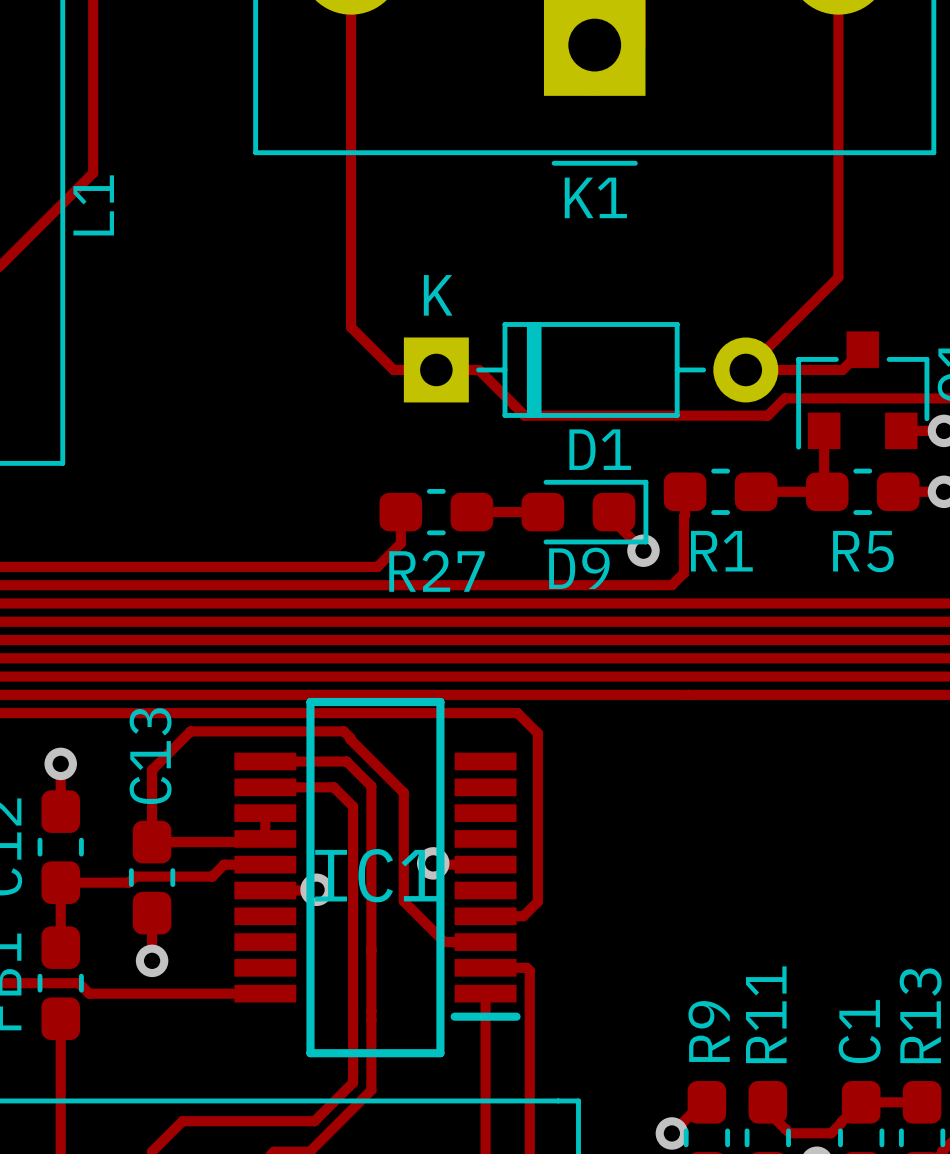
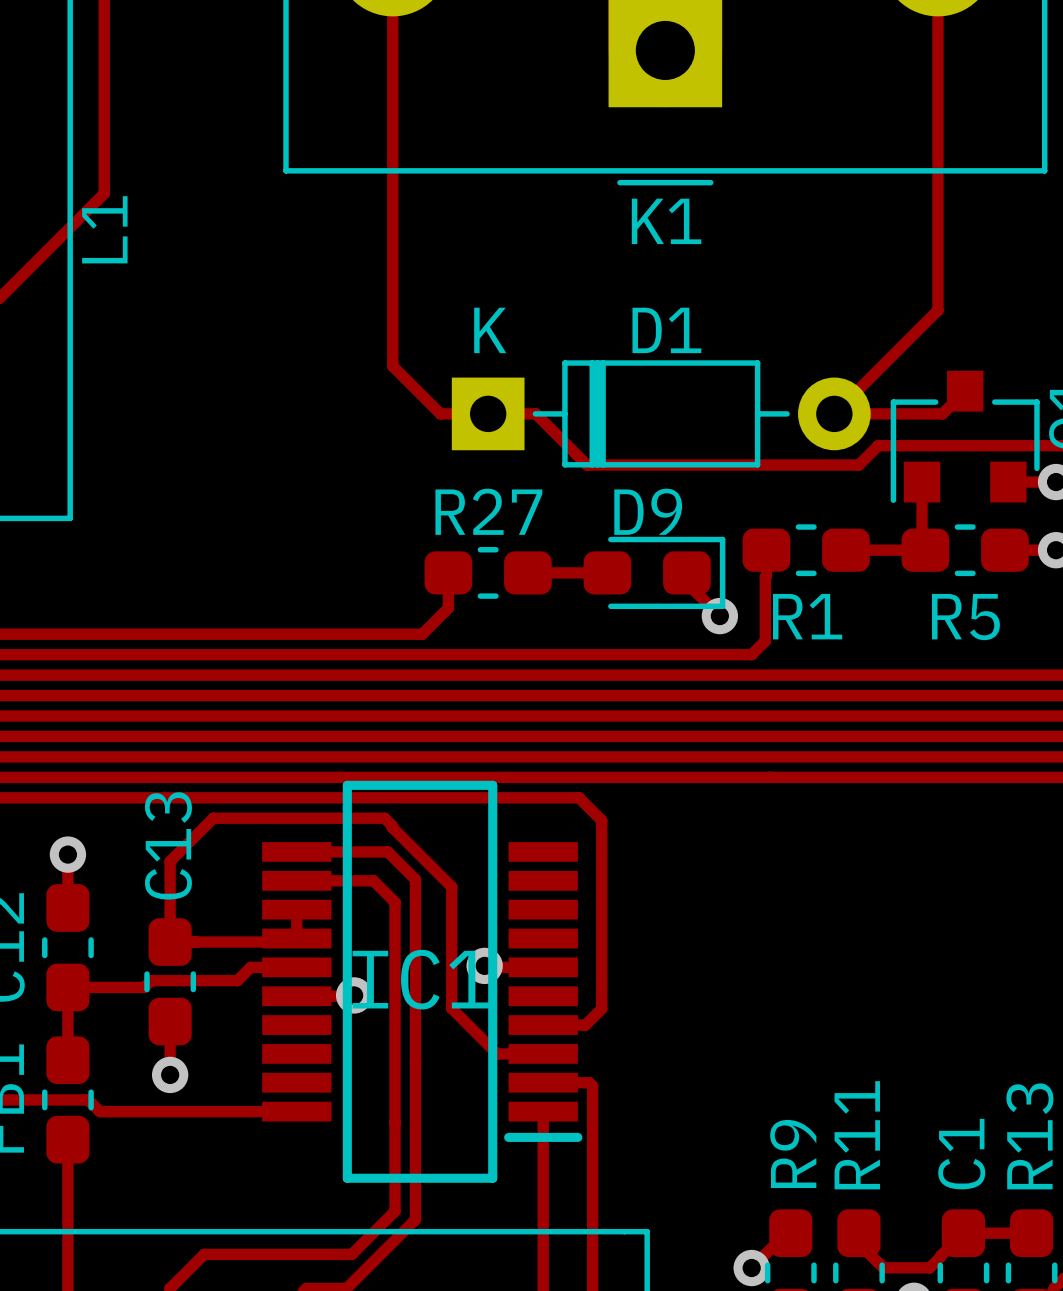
D1 name position: D1 (600, 449) -> D1 (666, 330)
D9 name position: D9 (579, 568) -> D9 (648, 511)
R27 name position: R27 (436, 571) -> R27 (488, 511)

